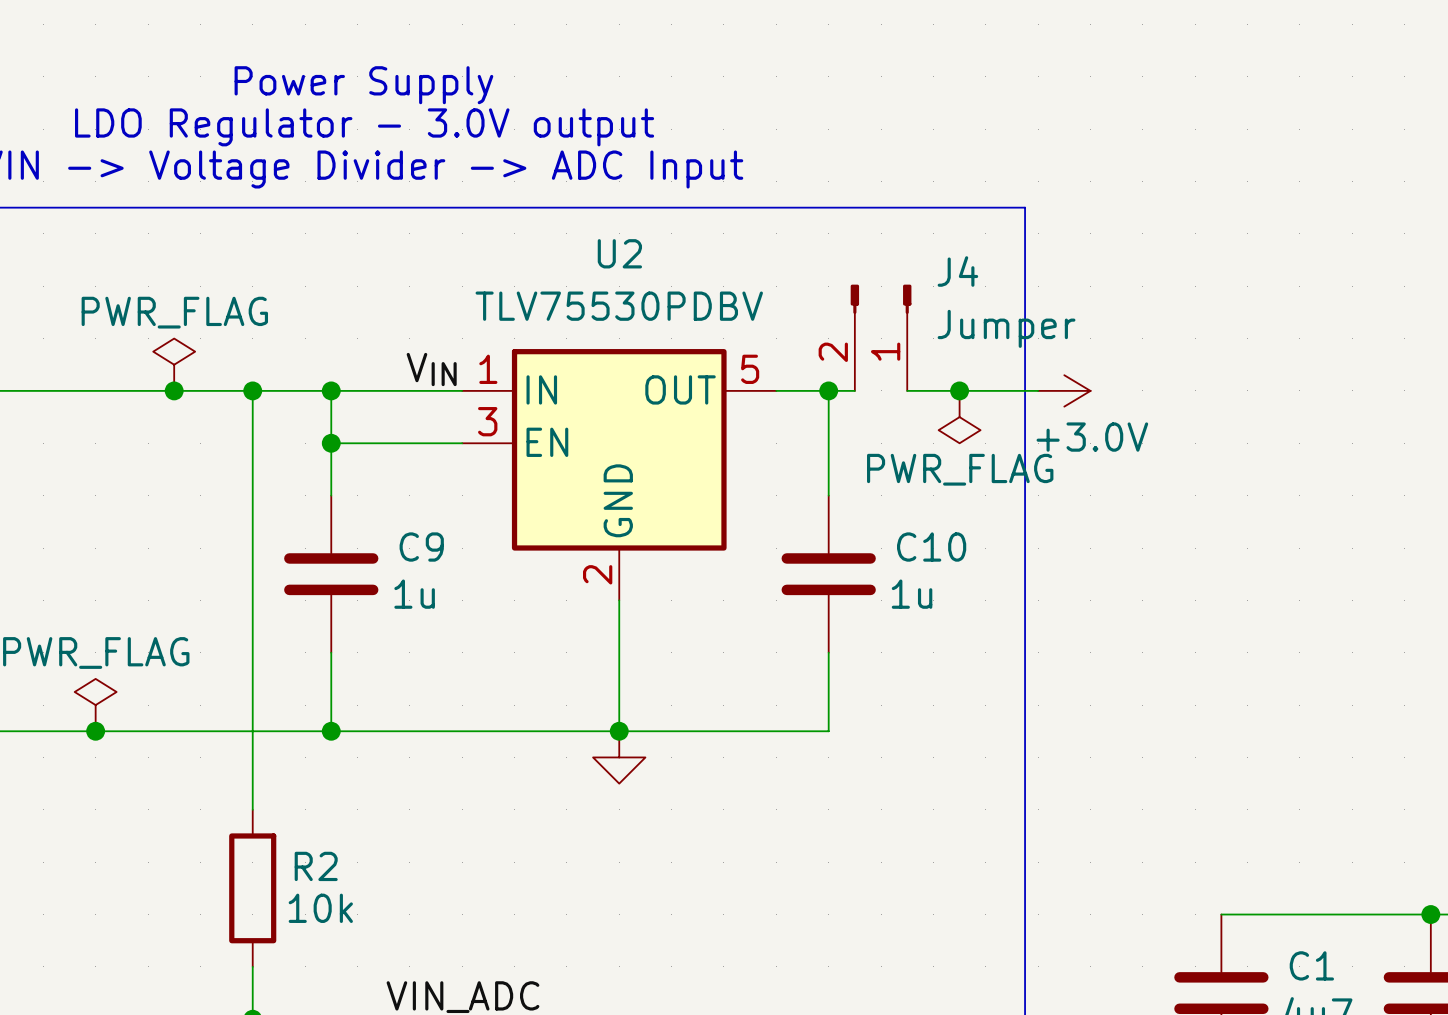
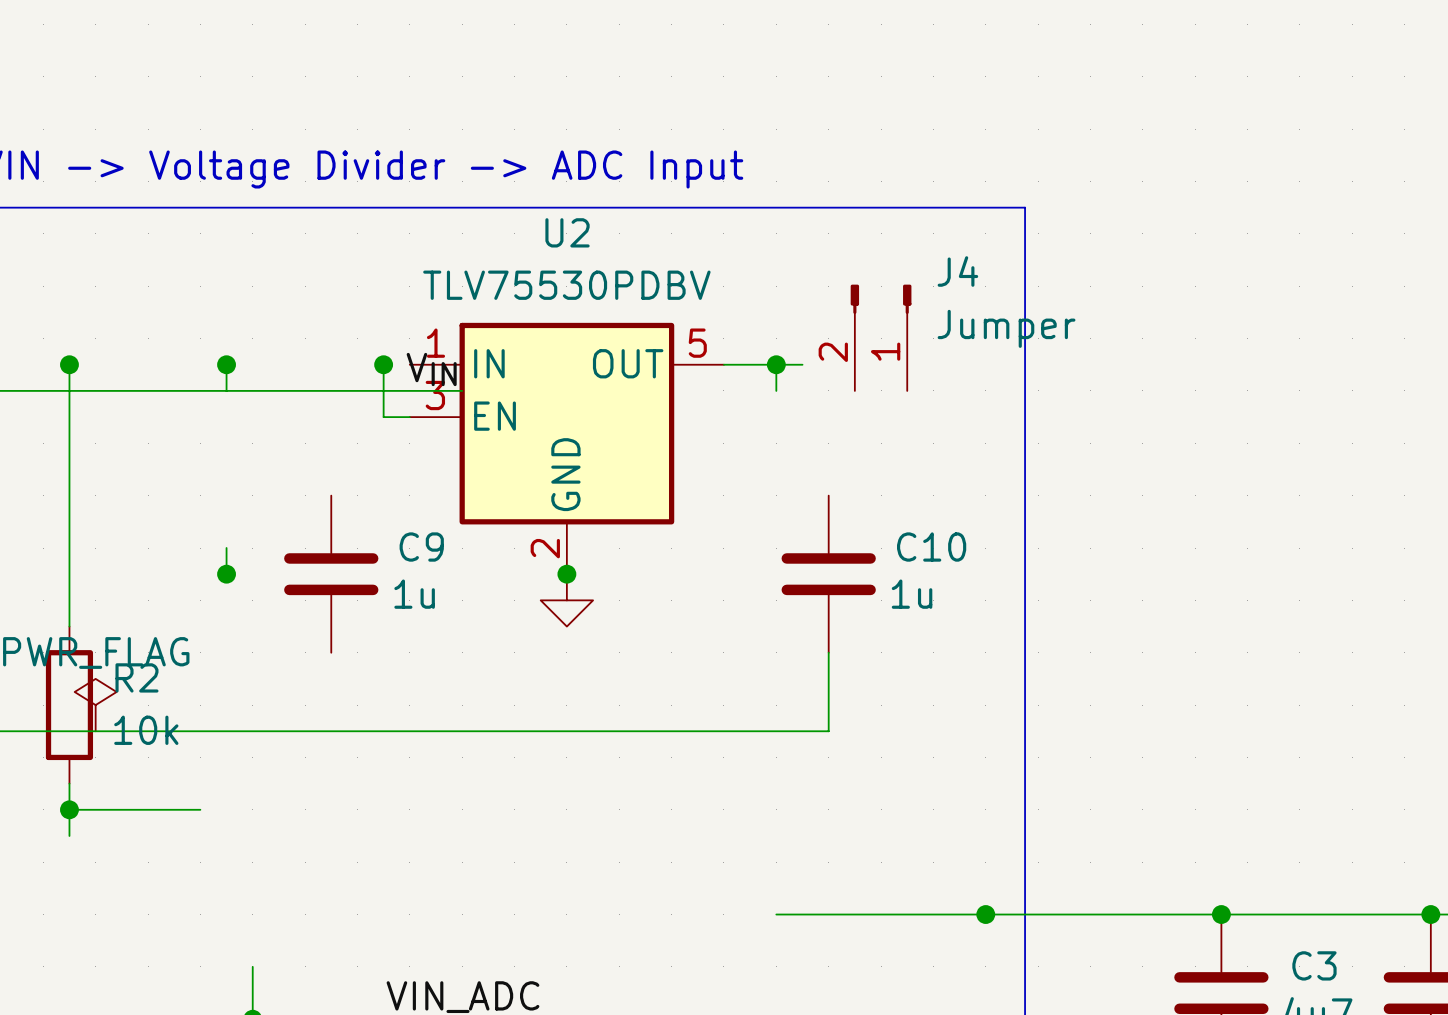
text: Power Supply (363, 85) -> none
text: LDO Regulator - 3.0V output (364, 127) -> none
U2 name position: U2 (619, 253) -> U2 (567, 232)
U2 value position: TLV75530PDBV (619, 306) -> TLV75530PDBV (566, 285)
wire: none -> (69, 364) (69, 626)
junction: none -> (69, 364)
power symbol: PWR_FLAG (174, 364) -> none
wire: none -> (226, 364) (226, 390)
junction: none -> (226, 364)
wire: none -> (383, 364) (383, 417) (409, 417)
junction: none -> (383, 364)
wire: none -> (723, 364) (802, 364)
junction: (174, 390) -> none
wire: (252, 390) (252, 809) -> none
junction: (252, 390) -> none
wire: (331, 390) (331, 495) -> none
junction: (331, 390) -> none
wire: (776, 390) (854, 390) -> (776, 390) (776, 364)
wire: (828, 390) (828, 495) -> none
junction position: (828, 390) -> (776, 364)
wire: (907, 390) (1038, 390) -> none
junction: (959, 390) -> none
power symbol: +3.0V (1064, 390) -> none
power symbol: PWR_FLAG (959, 417) -> none
wire: (331, 443) (462, 443) -> (69, 809) (200, 809)
junction: (331, 443) -> none
U2 position: (619, 474) -> (566, 448)
wire: none -> (226, 548) (226, 574)
junction: none -> (226, 574)
junction: none -> (566, 574)
wire: (619, 600) (619, 731) -> none
wire: (331, 652) (331, 731) -> none
junction position: (95, 731) -> (69, 809)
junction: (331, 731) -> none
junction: (619, 731) -> none
power symbol position: (619, 757) -> (566, 600)
wire: none -> (69, 783) (69, 835)
R2 name position: R2 (316, 866) -> R2 (136, 677)
R2 position: (252, 888) -> (69, 705)
R2 value position: 10k (320, 908) -> 10k (146, 730)
wire: none -> (776, 914) (1221, 914)
junction: none -> (985, 914)
junction: none -> (1221, 914)
C1 name: C1 (1311, 965) -> C3 (1314, 965)

